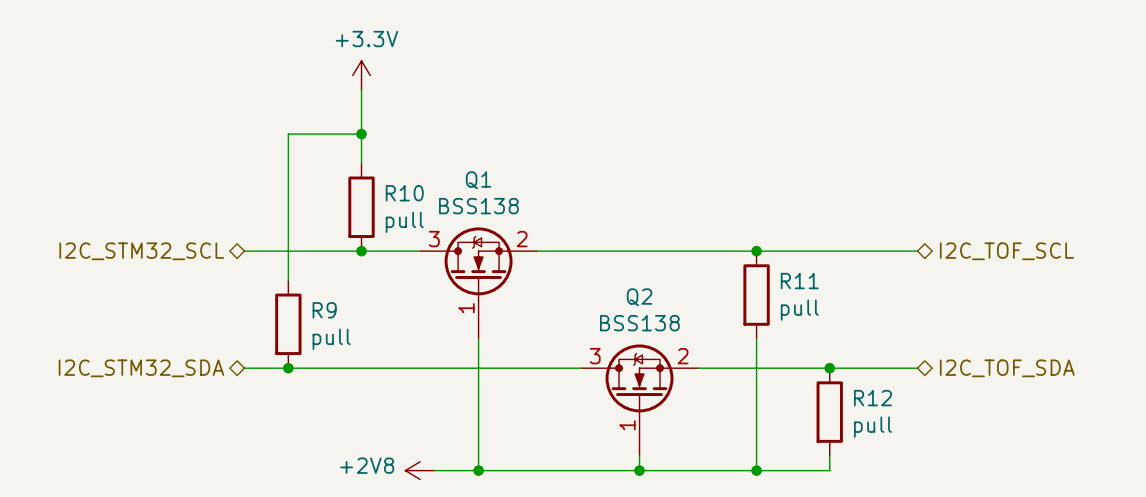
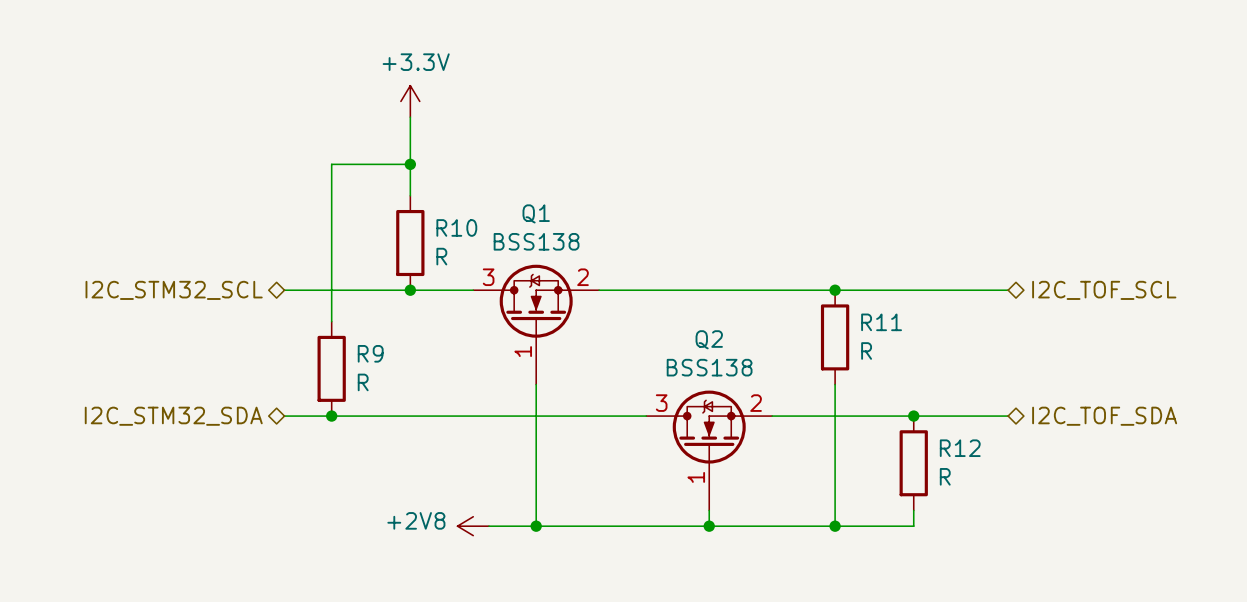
R10 value: pull (404, 222) -> R (441, 256)
R11 value: pull (799, 310) -> R (866, 350)
R9 value: pull (331, 339) -> R (363, 382)
R12 value: pull (872, 427) -> R (945, 476)

